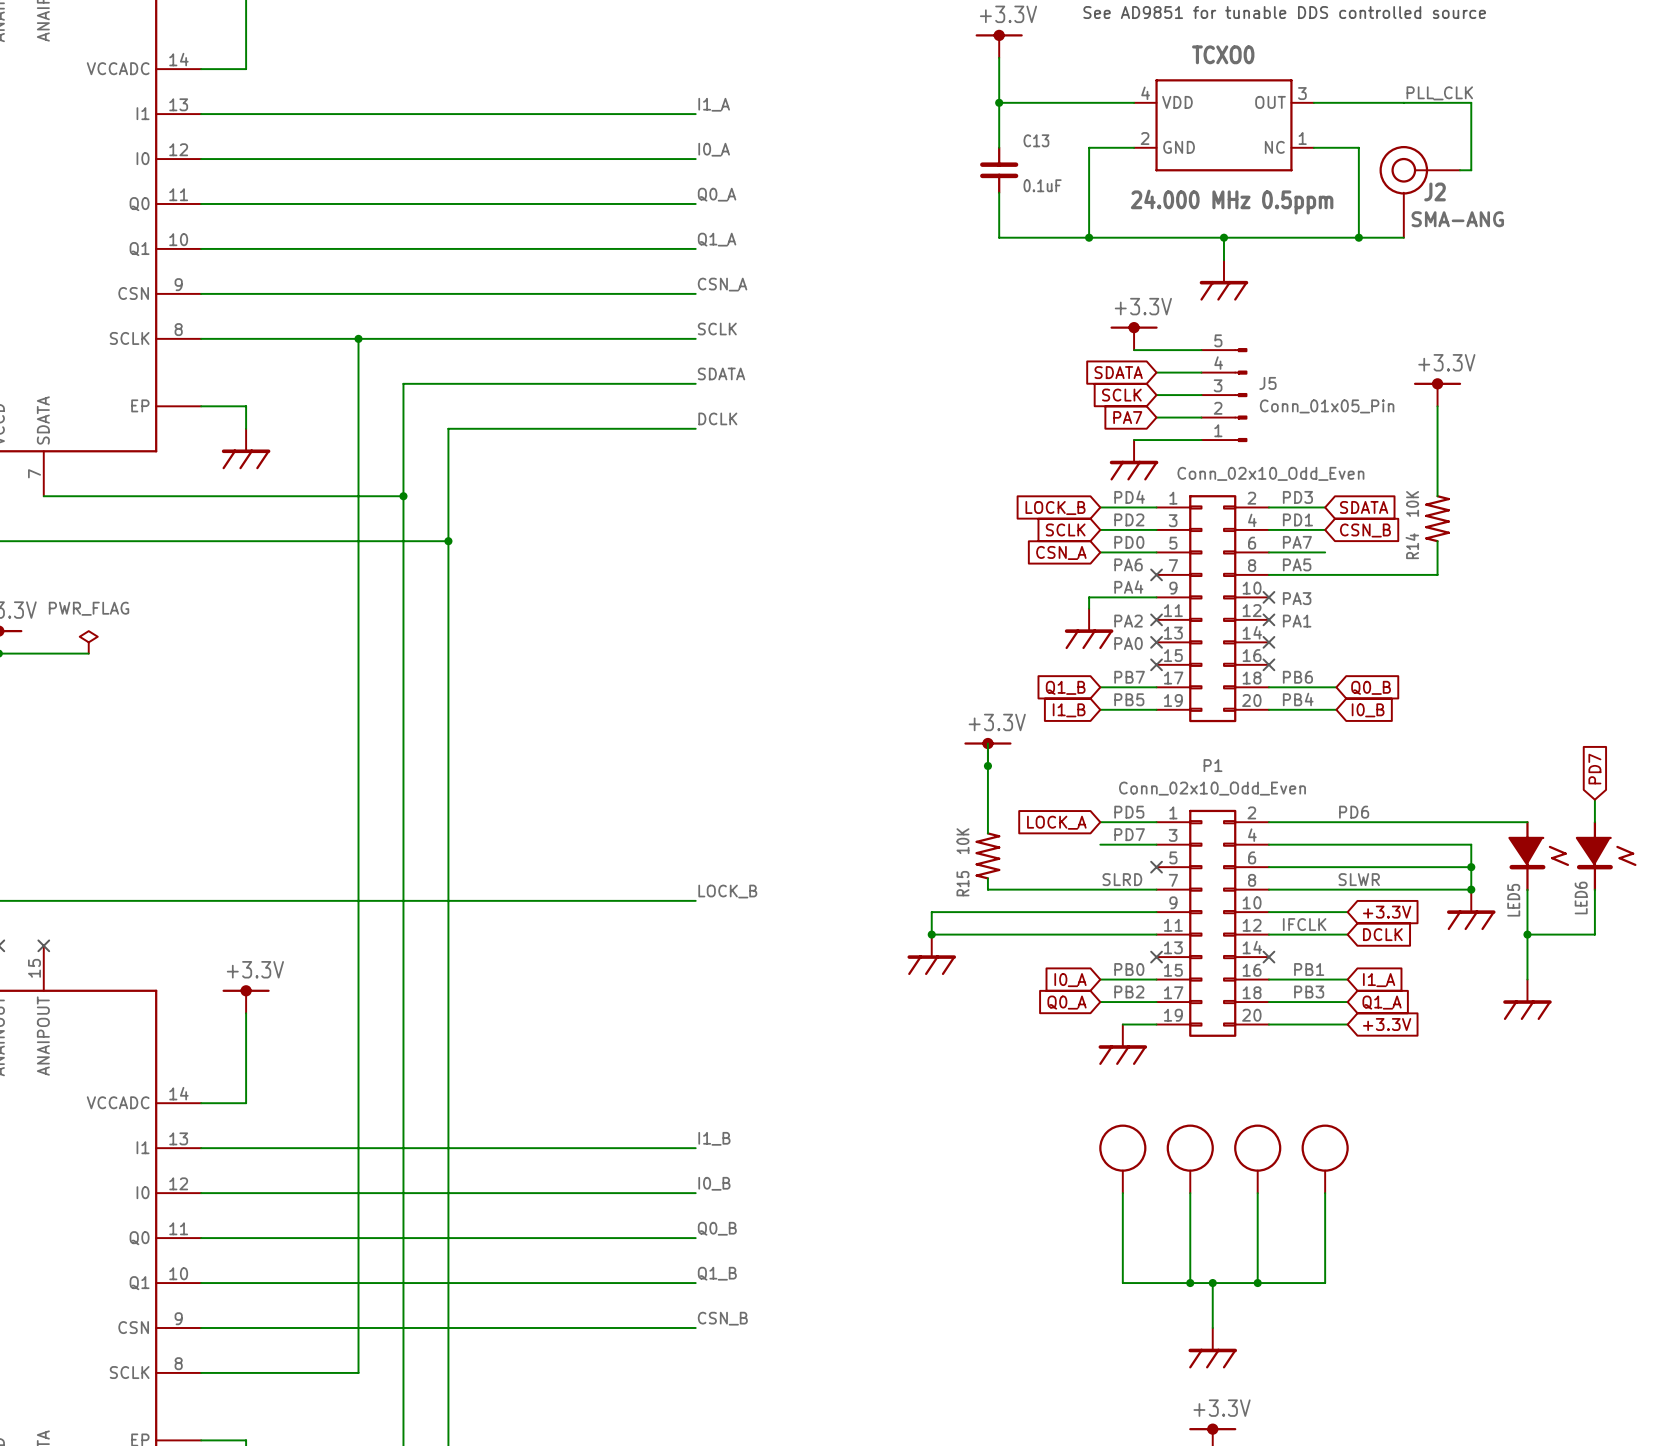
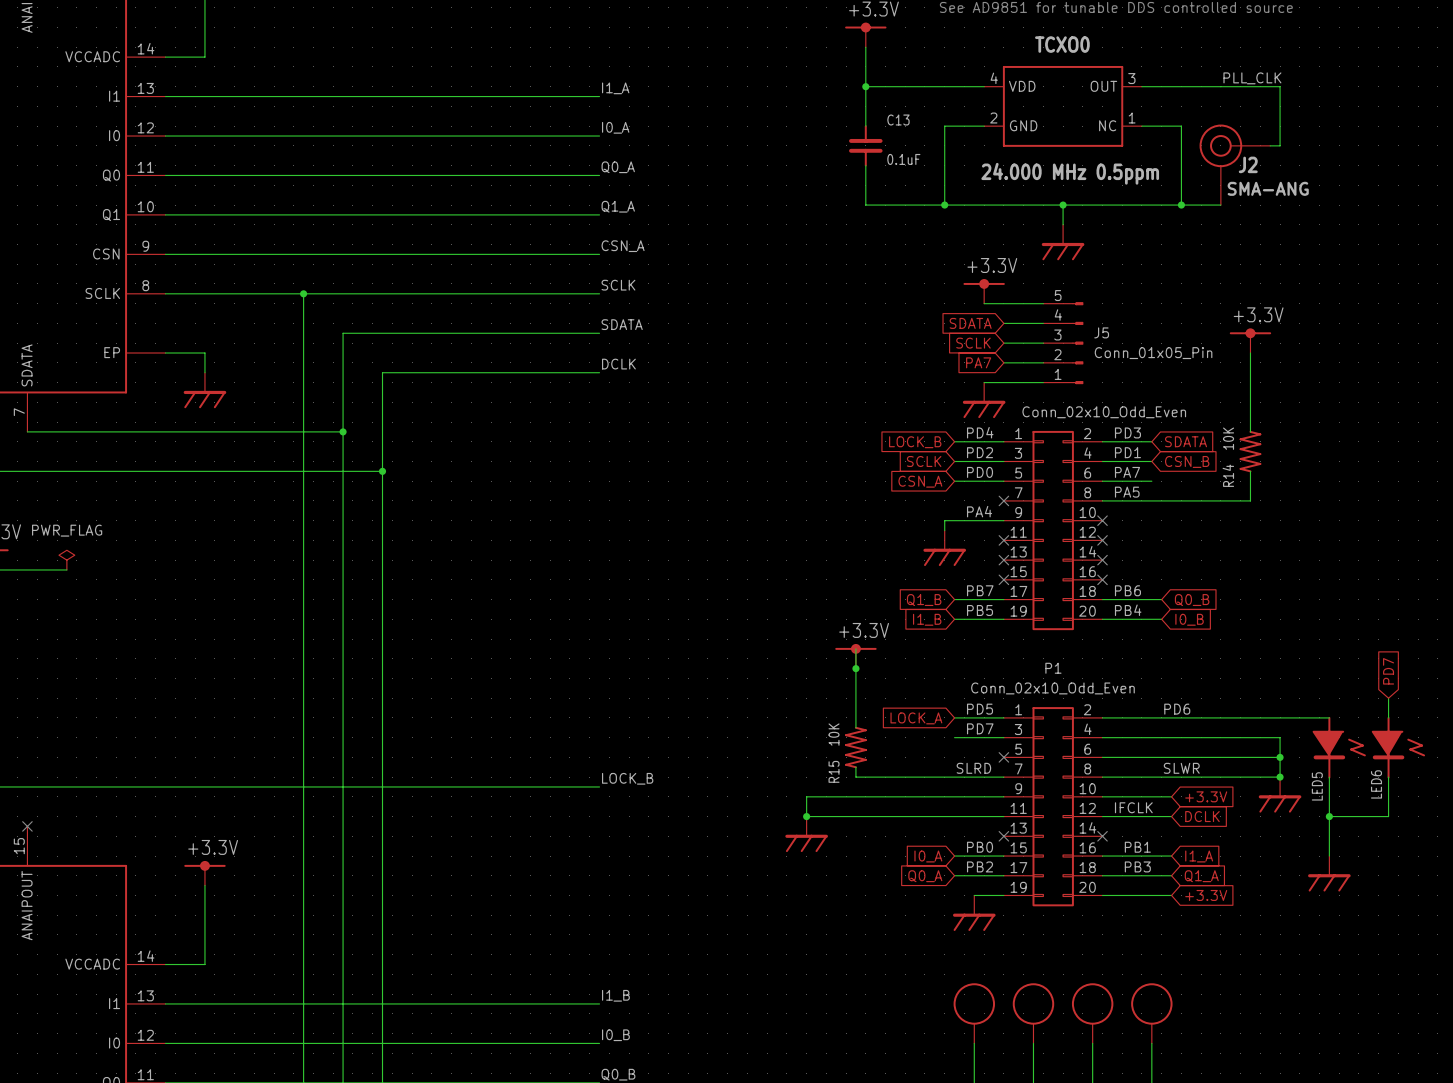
label: PA6 (1128, 564) -> none
label: PA3 (1297, 598) -> none
label: PA2 (1128, 621) -> none
label: PA1 (1297, 621) -> none
label: PA0 (1128, 643) -> none

